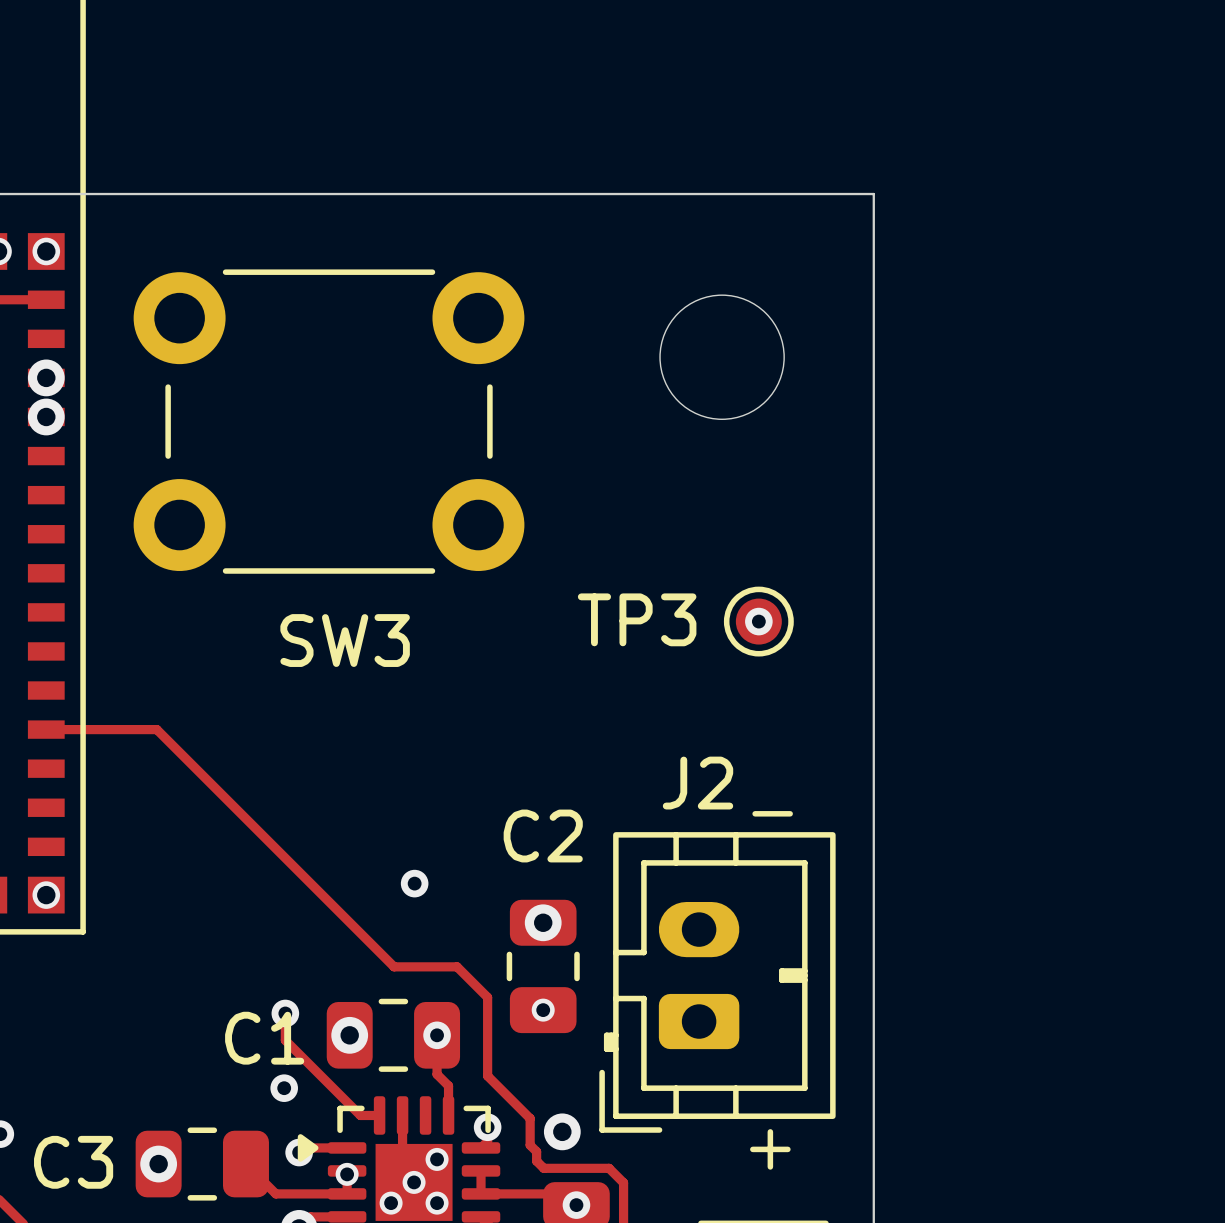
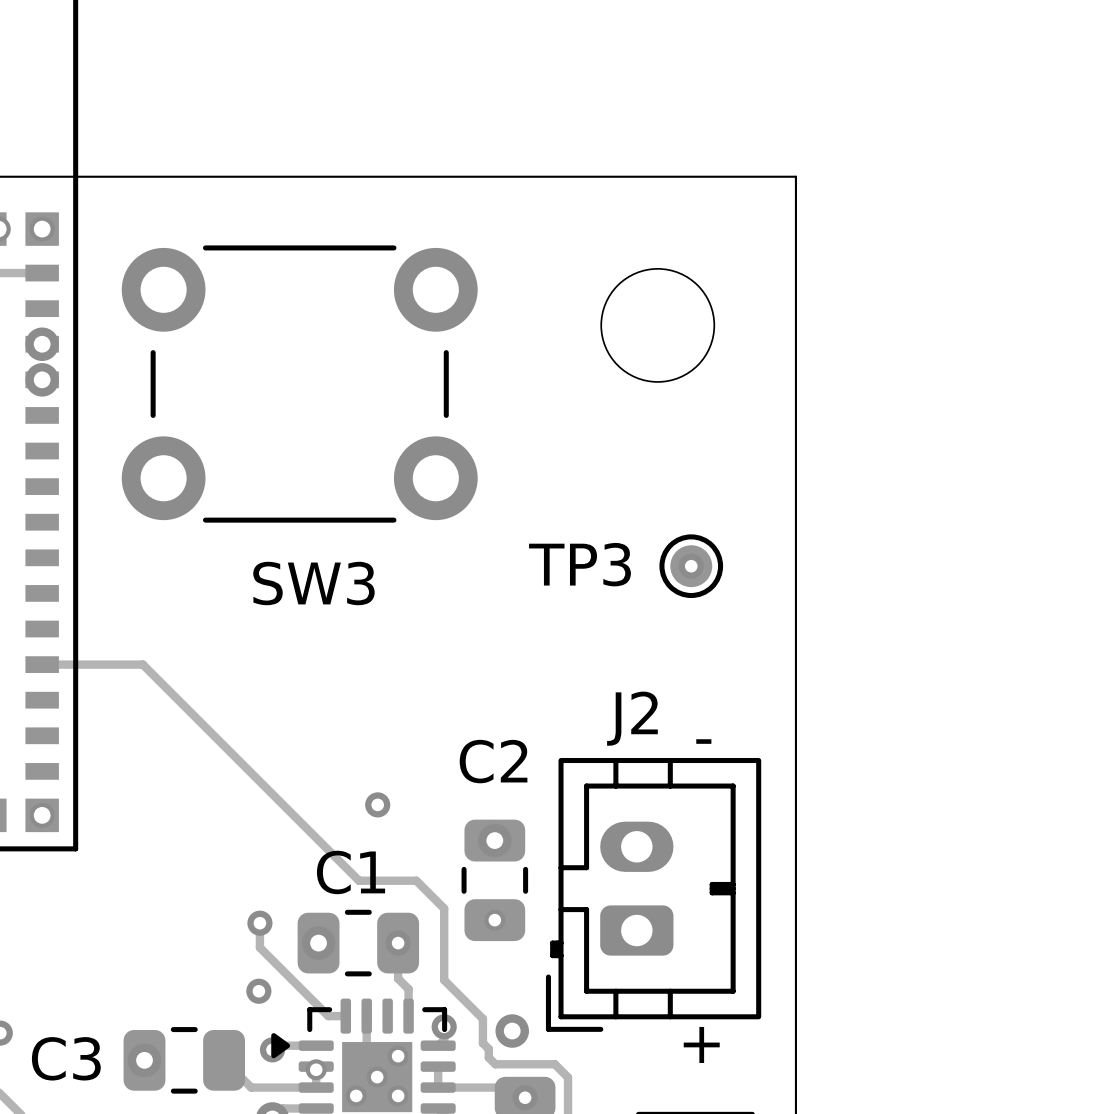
C1 name position: C1 (264, 1038) -> C1 (351, 872)

